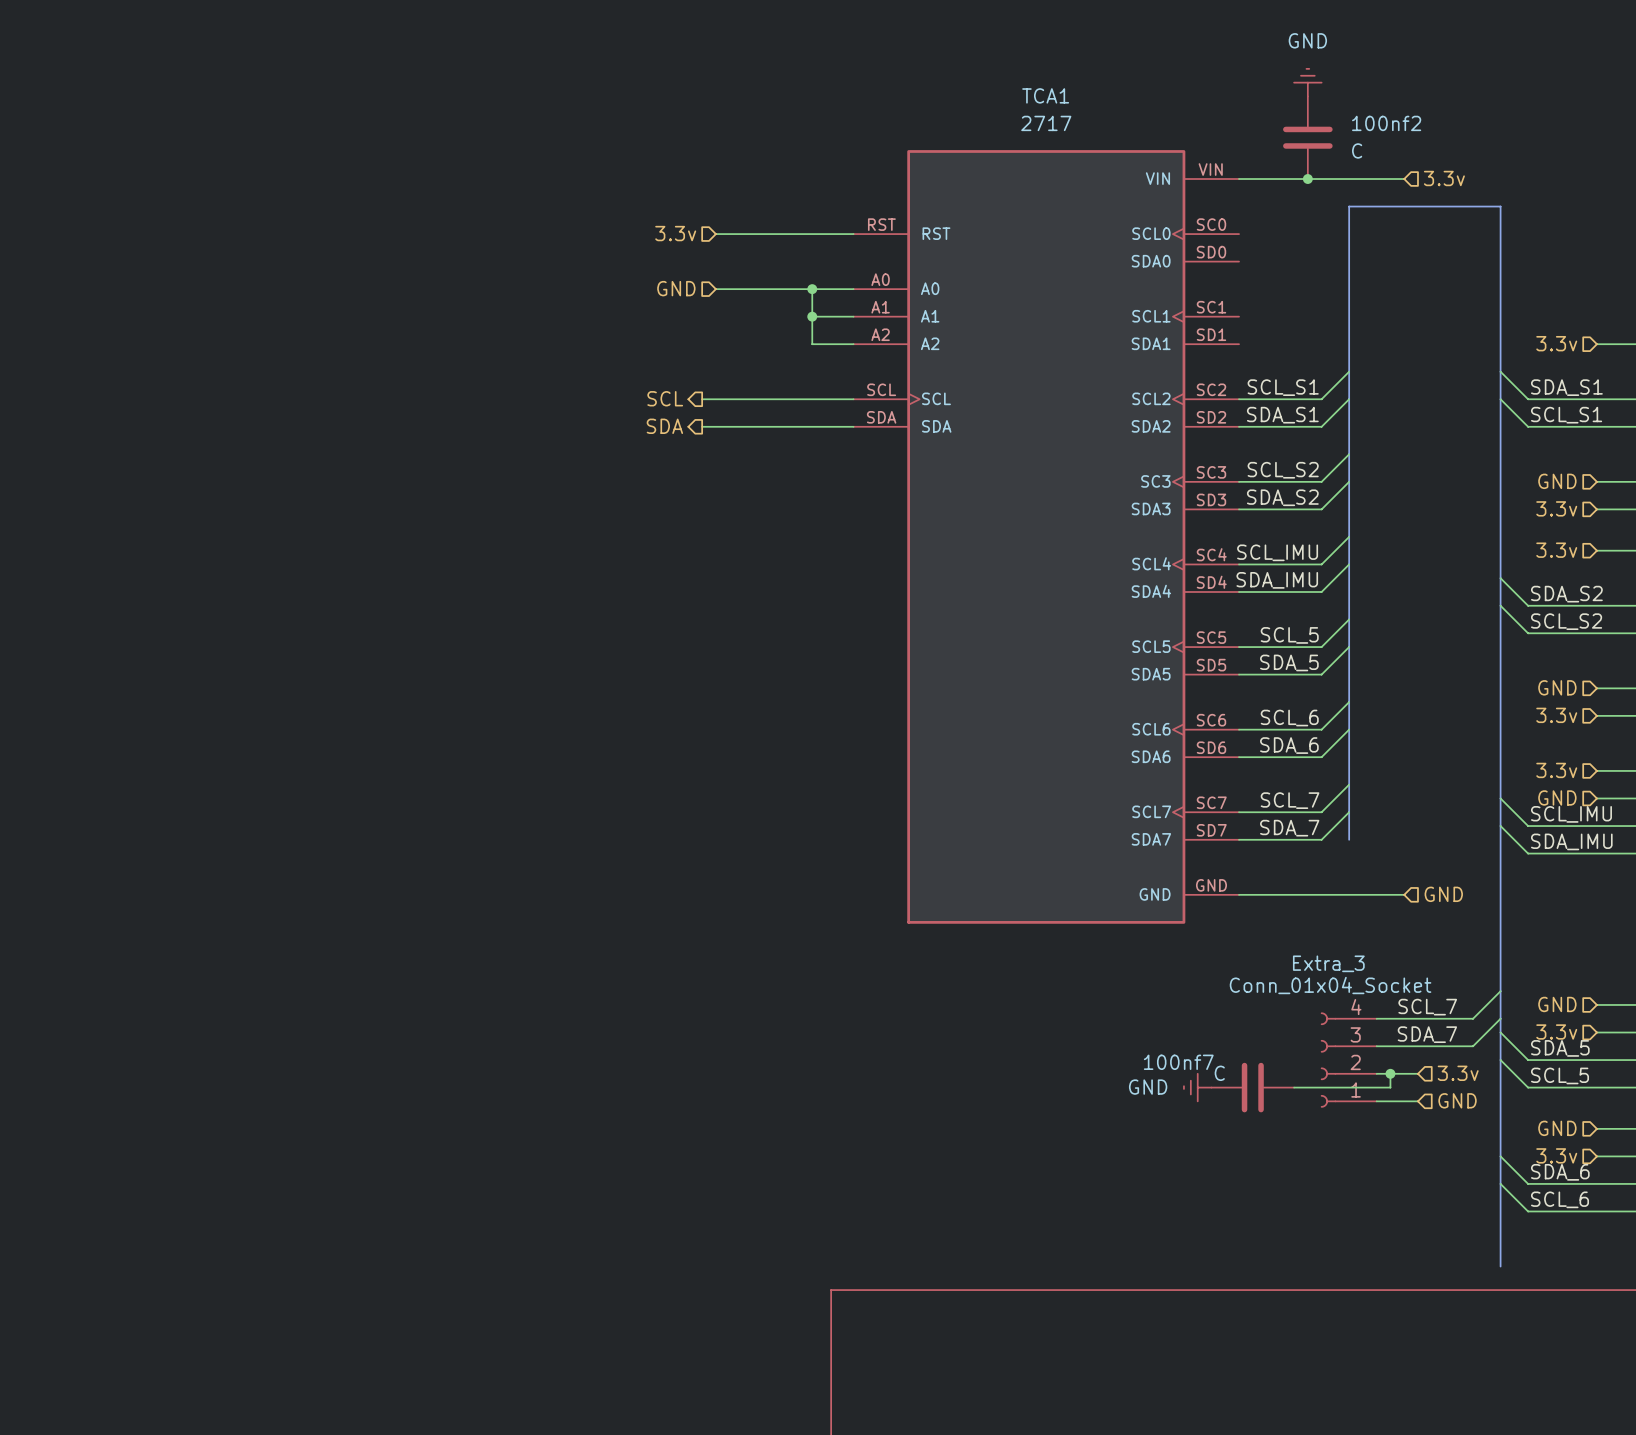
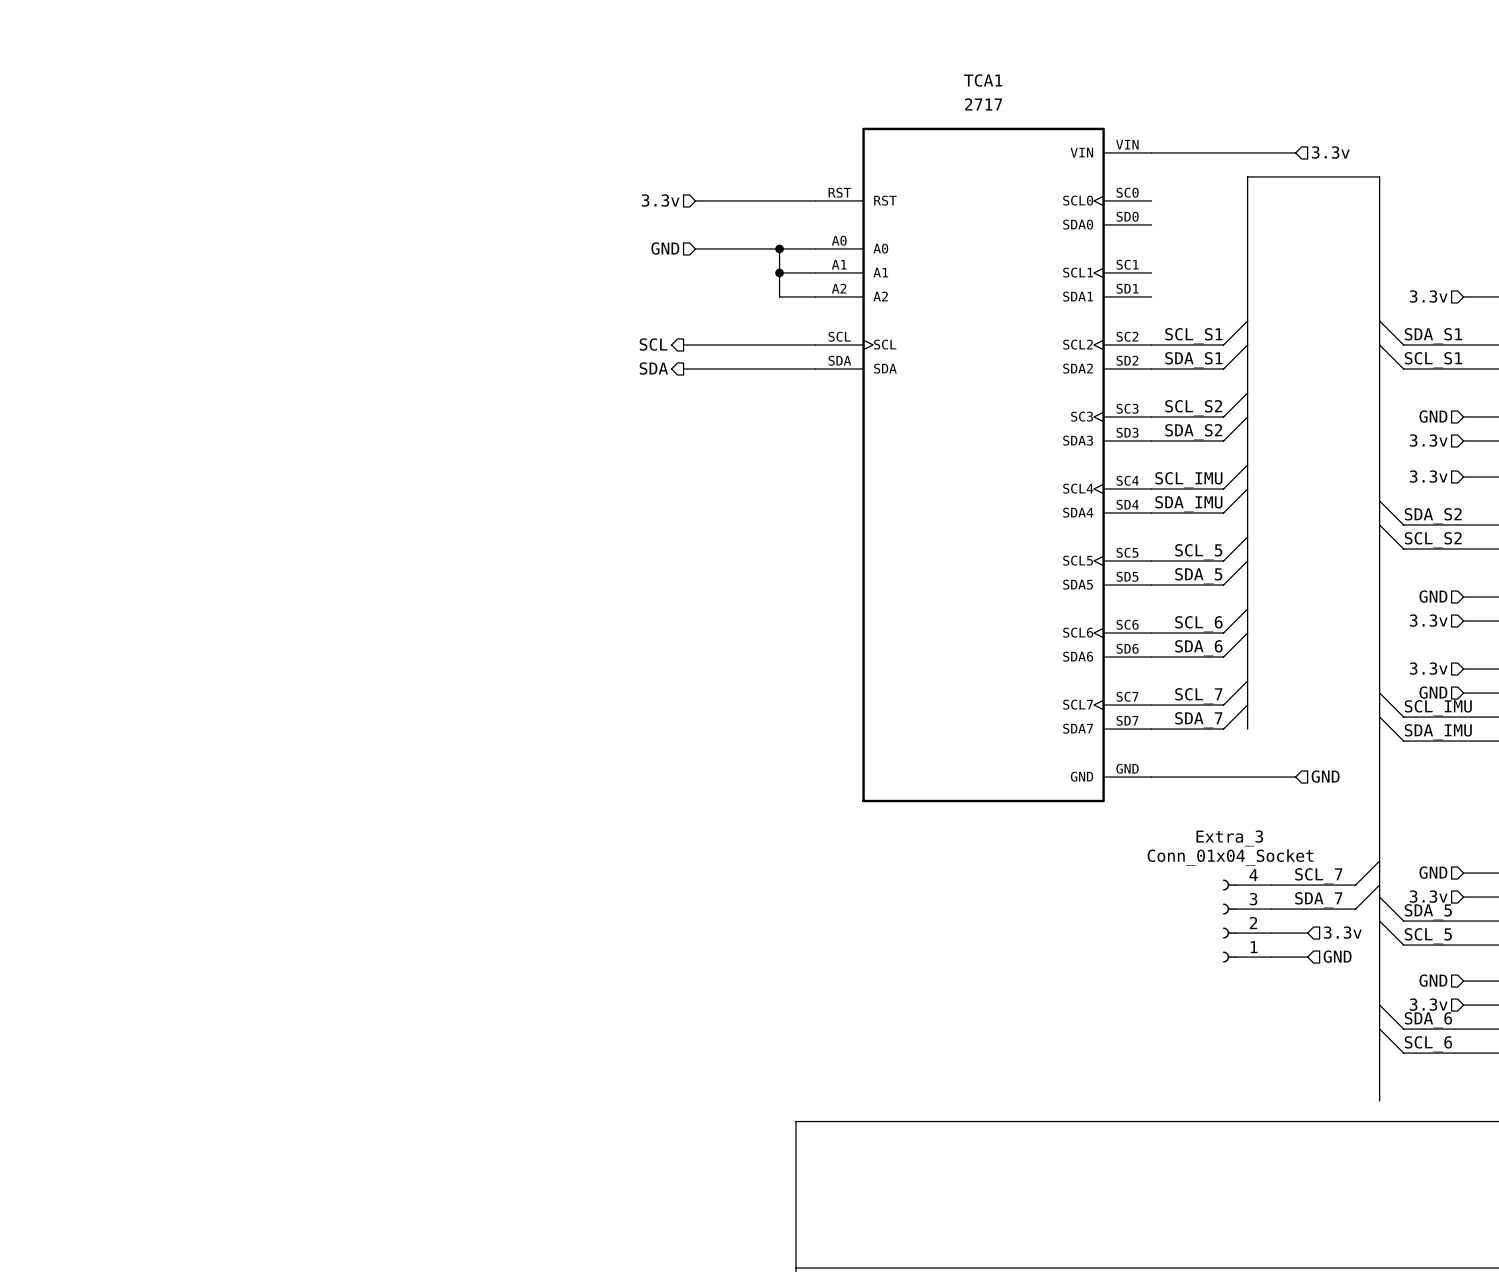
power symbol: GND (1307, 82) -> none
100nf2: C (1307, 137) -> none
junction: (1307, 179) -> none
wire: (1390, 1073) (1390, 1087) (1294, 1087) -> none
junction: (1390, 1073) -> none
power symbol: GND (1197, 1087) -> none
100nf7: C (1252, 1087) -> none

